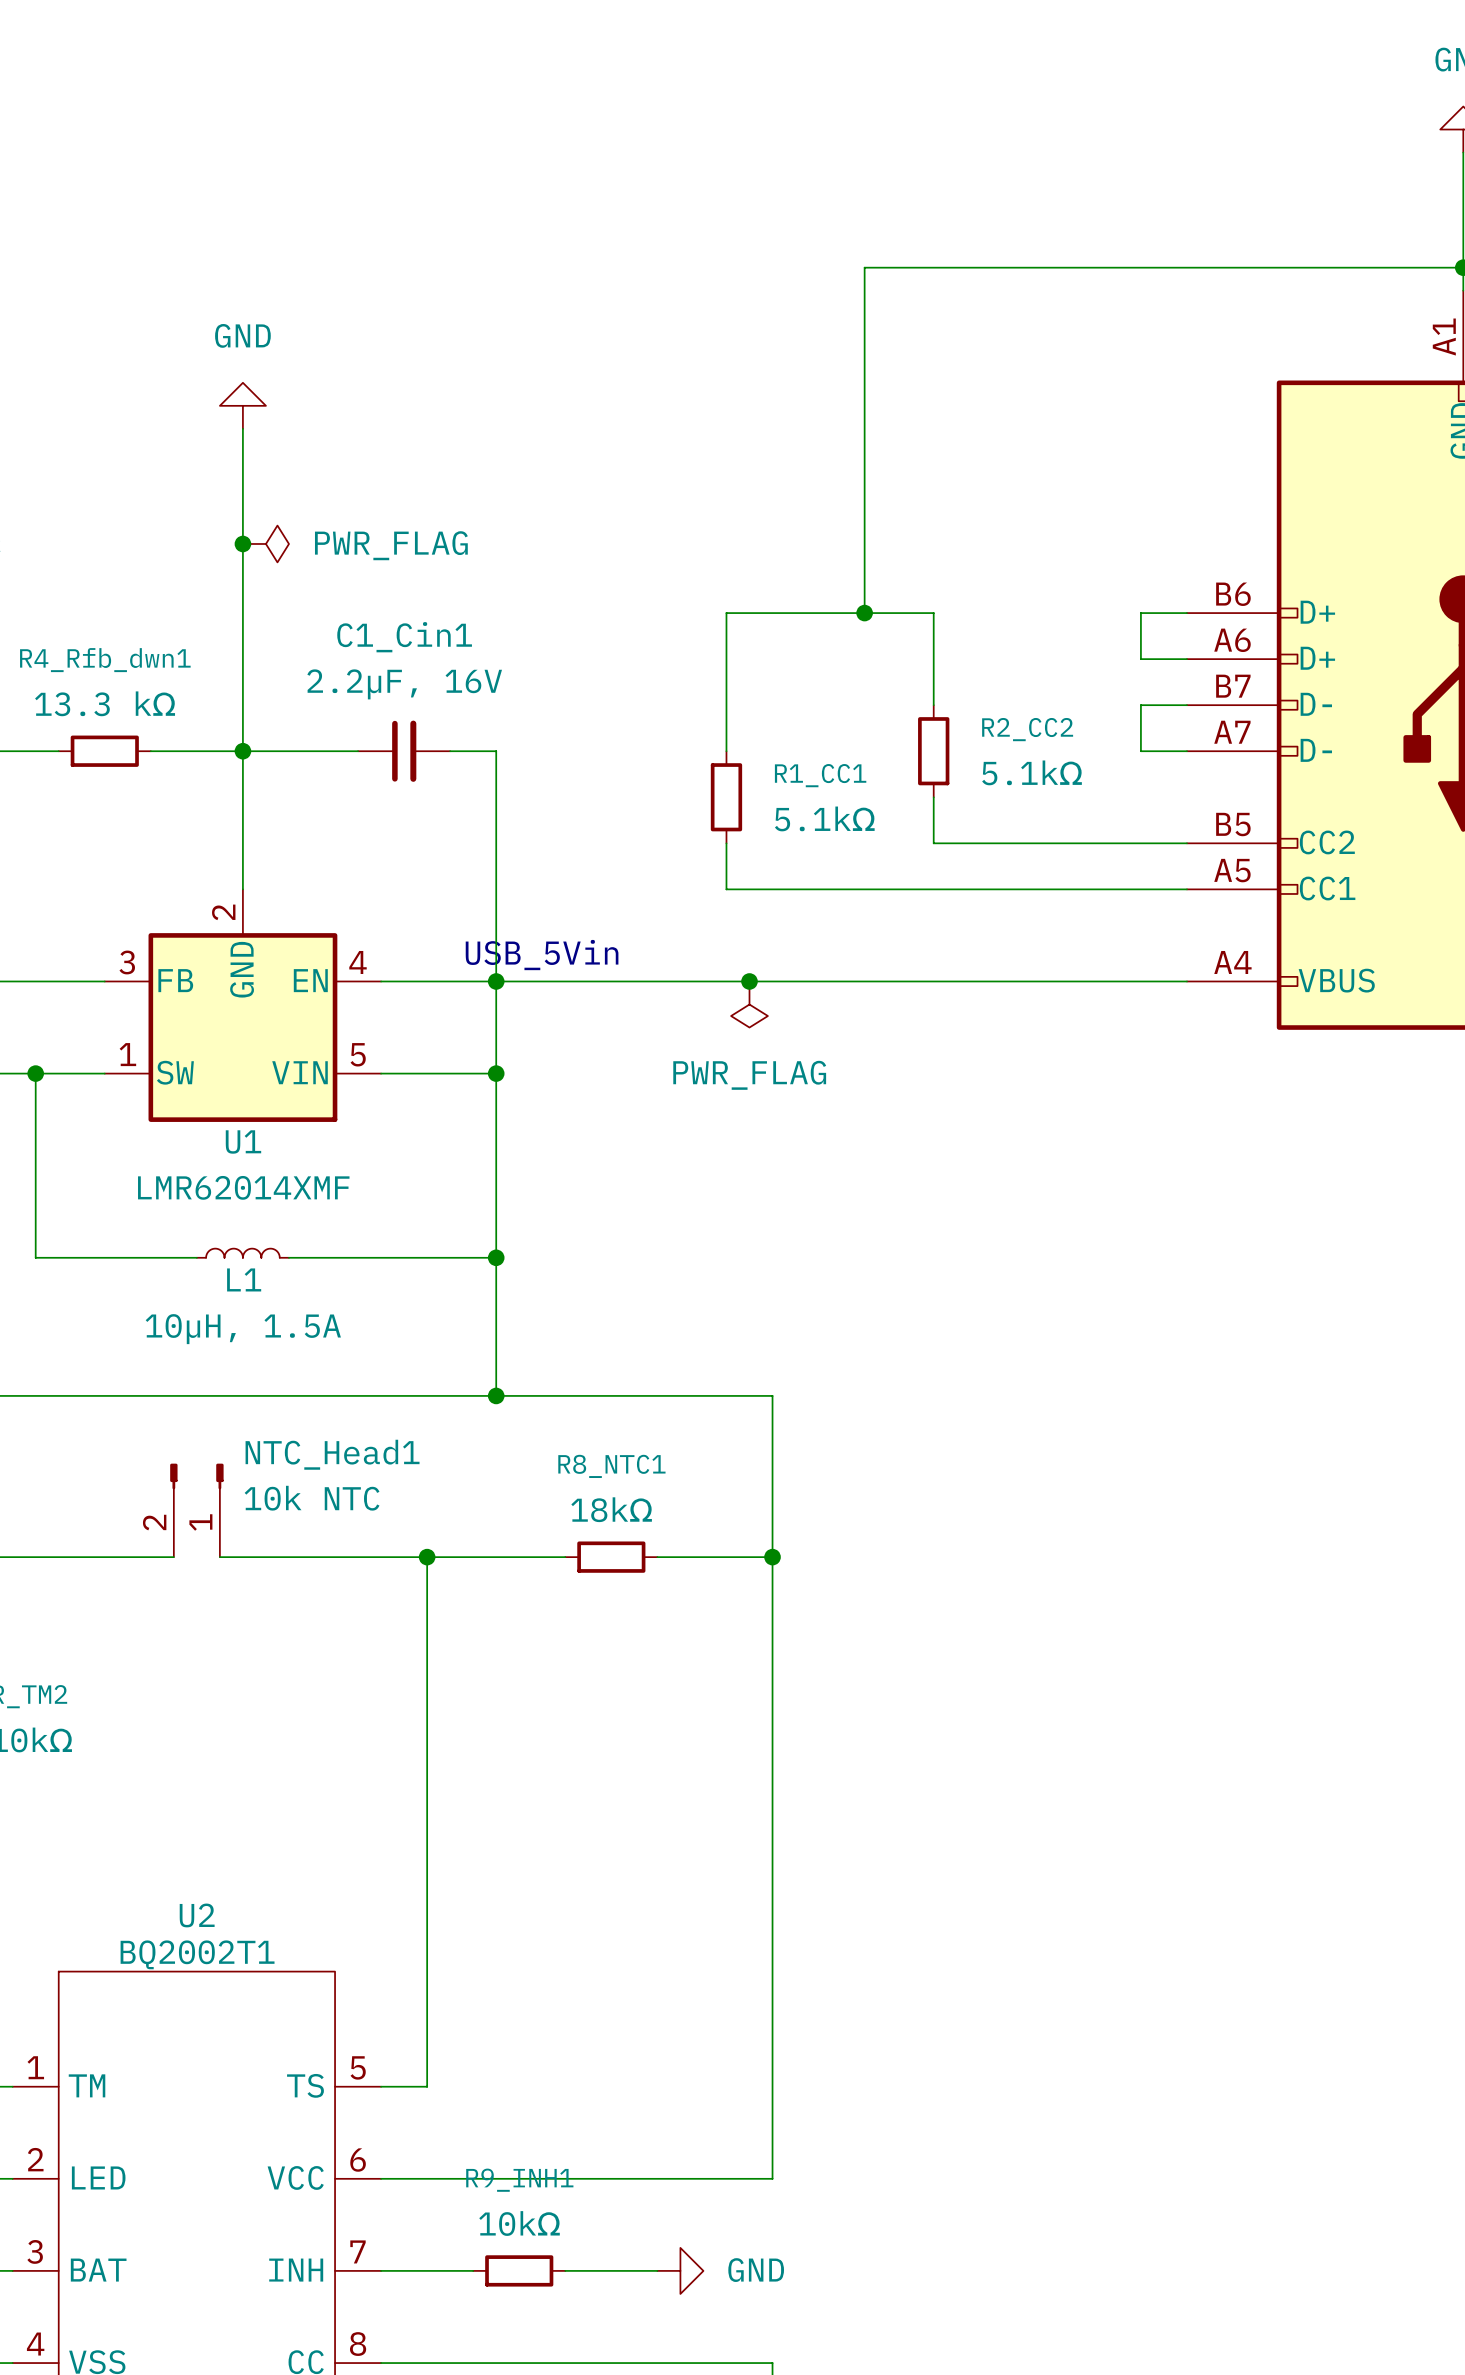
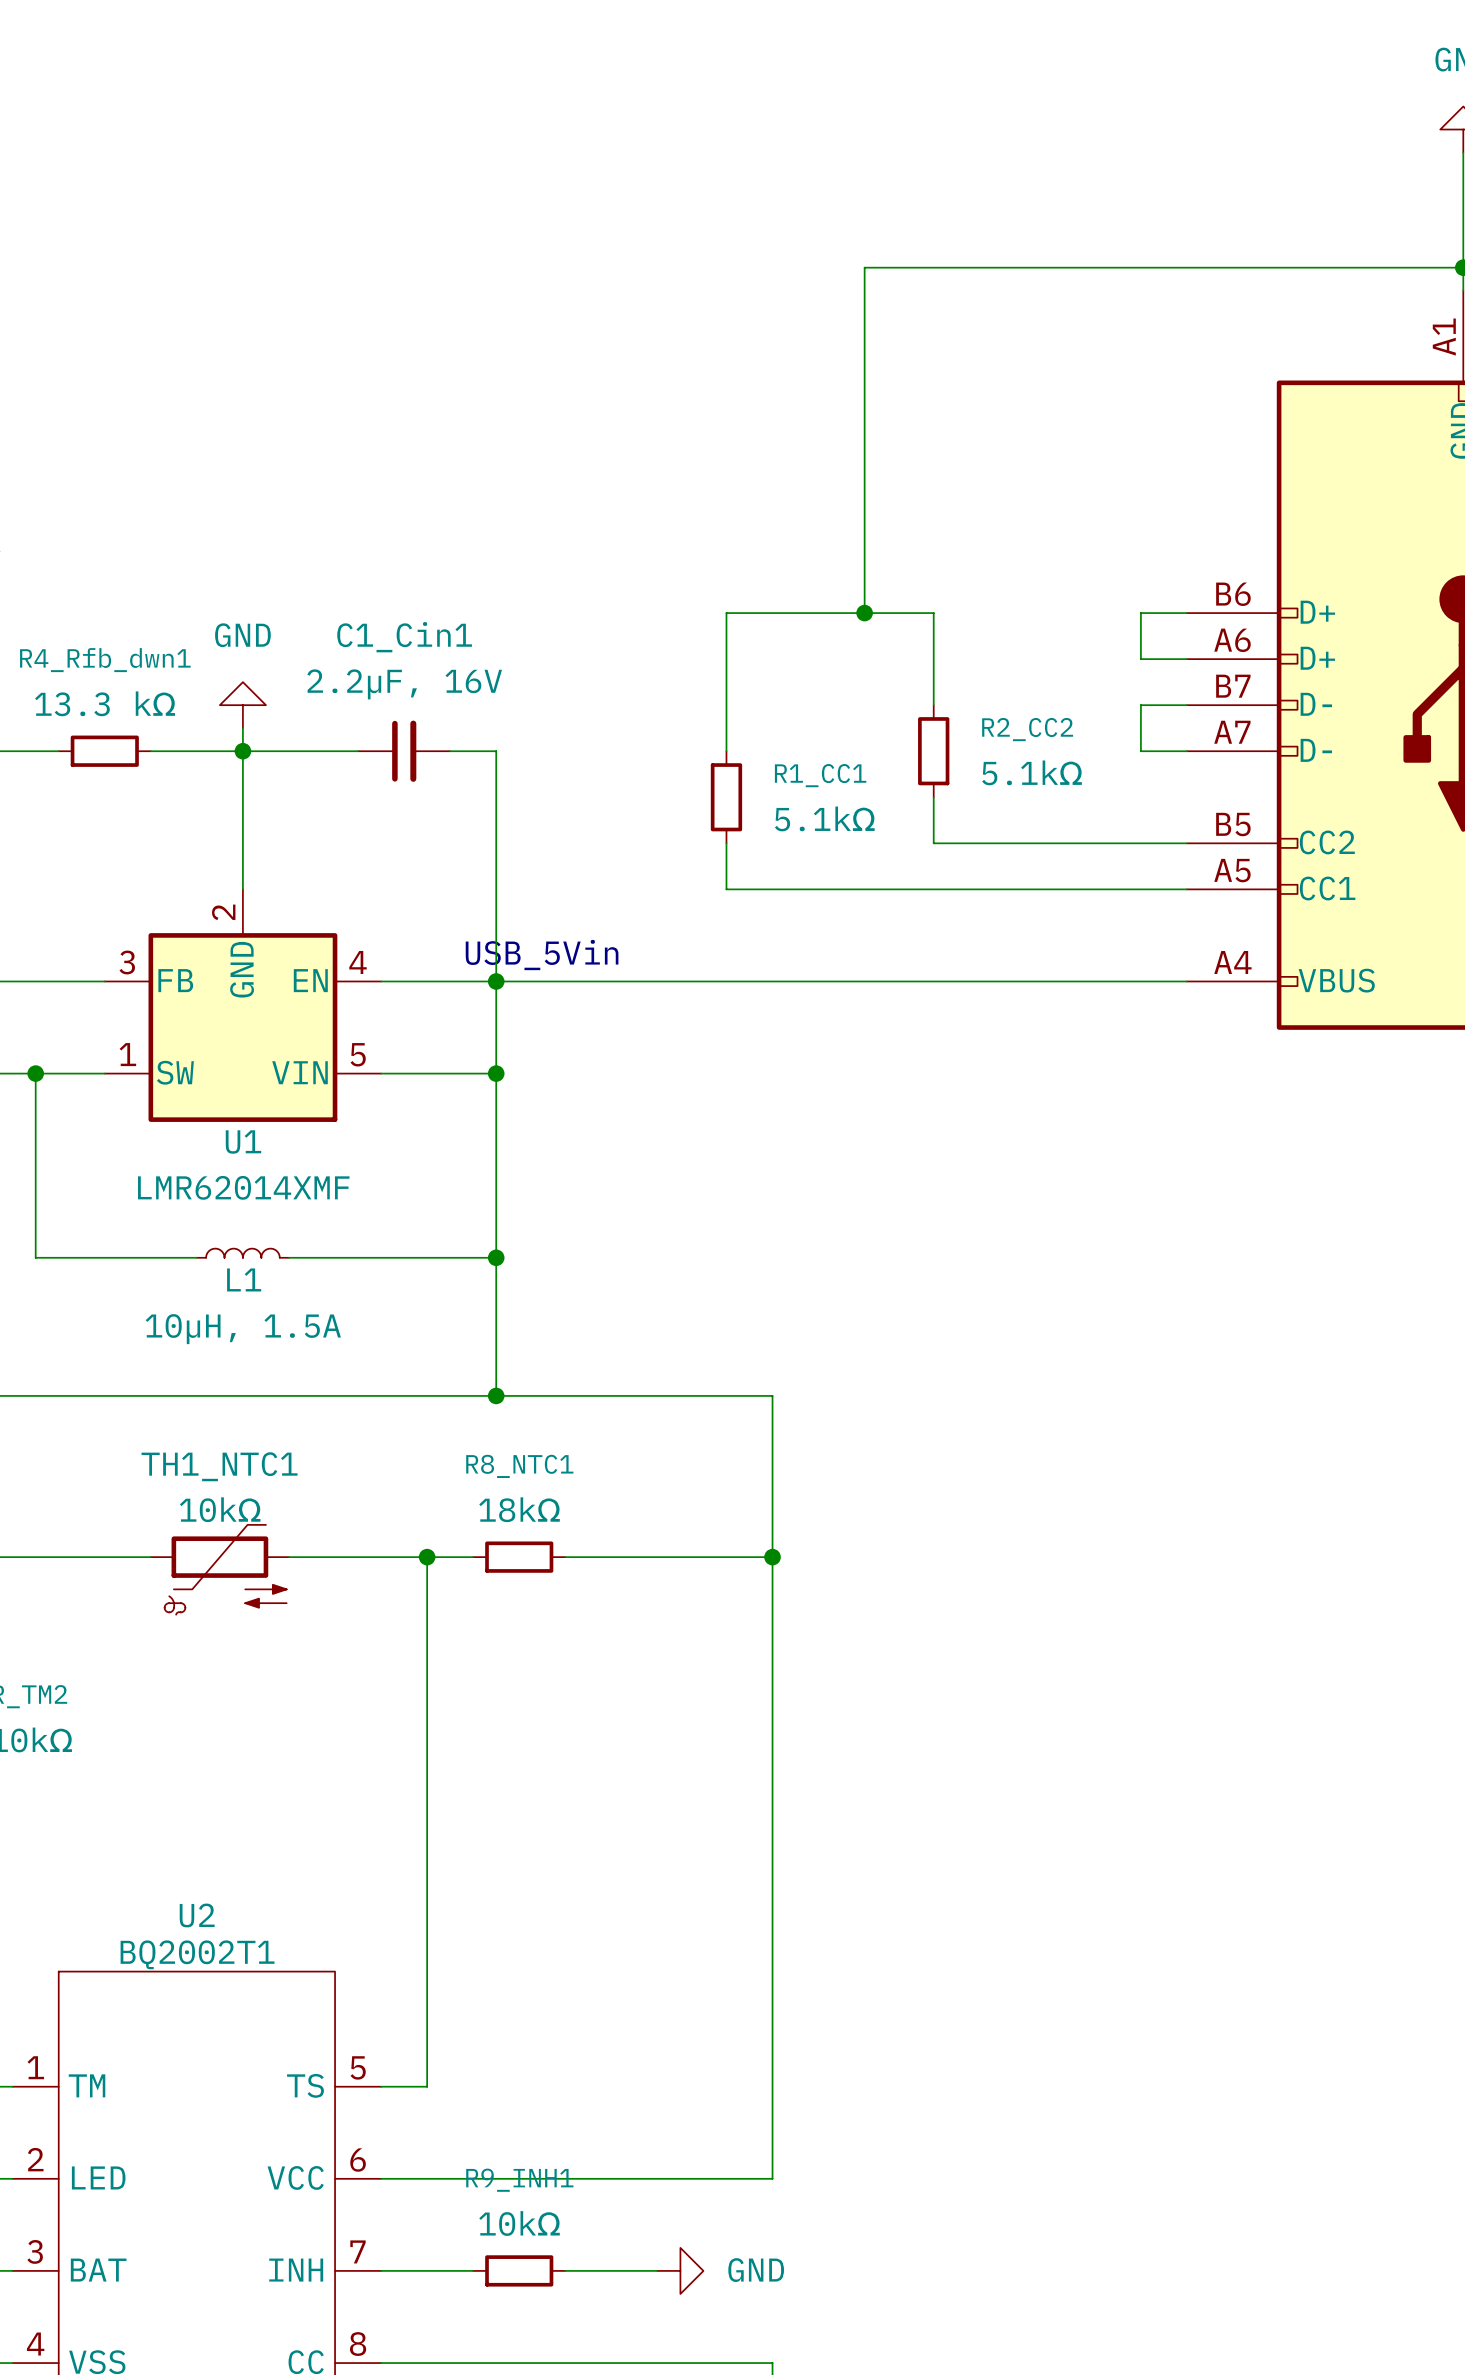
power symbol position: GND (242, 405) -> GND (242, 705)
wire: (242, 428) (242, 728) -> none
junction: (242, 543) -> none
power symbol: PWR_FLAG (265, 543) -> none
junction: (749, 981) -> none
power symbol: PWR_FLAG (749, 1004) -> none
NTC_Head1: 10k NTC (196, 1510) -> none
wire: (219, 1557) (288, 1557) -> none
wire: (473, 1557) (565, 1557) -> (657, 1557) (565, 1557)
R8_NTC1 position: (611, 1557) -> (519, 1557)
TH1_NTC1: none -> 10kΩ (219, 1569)

